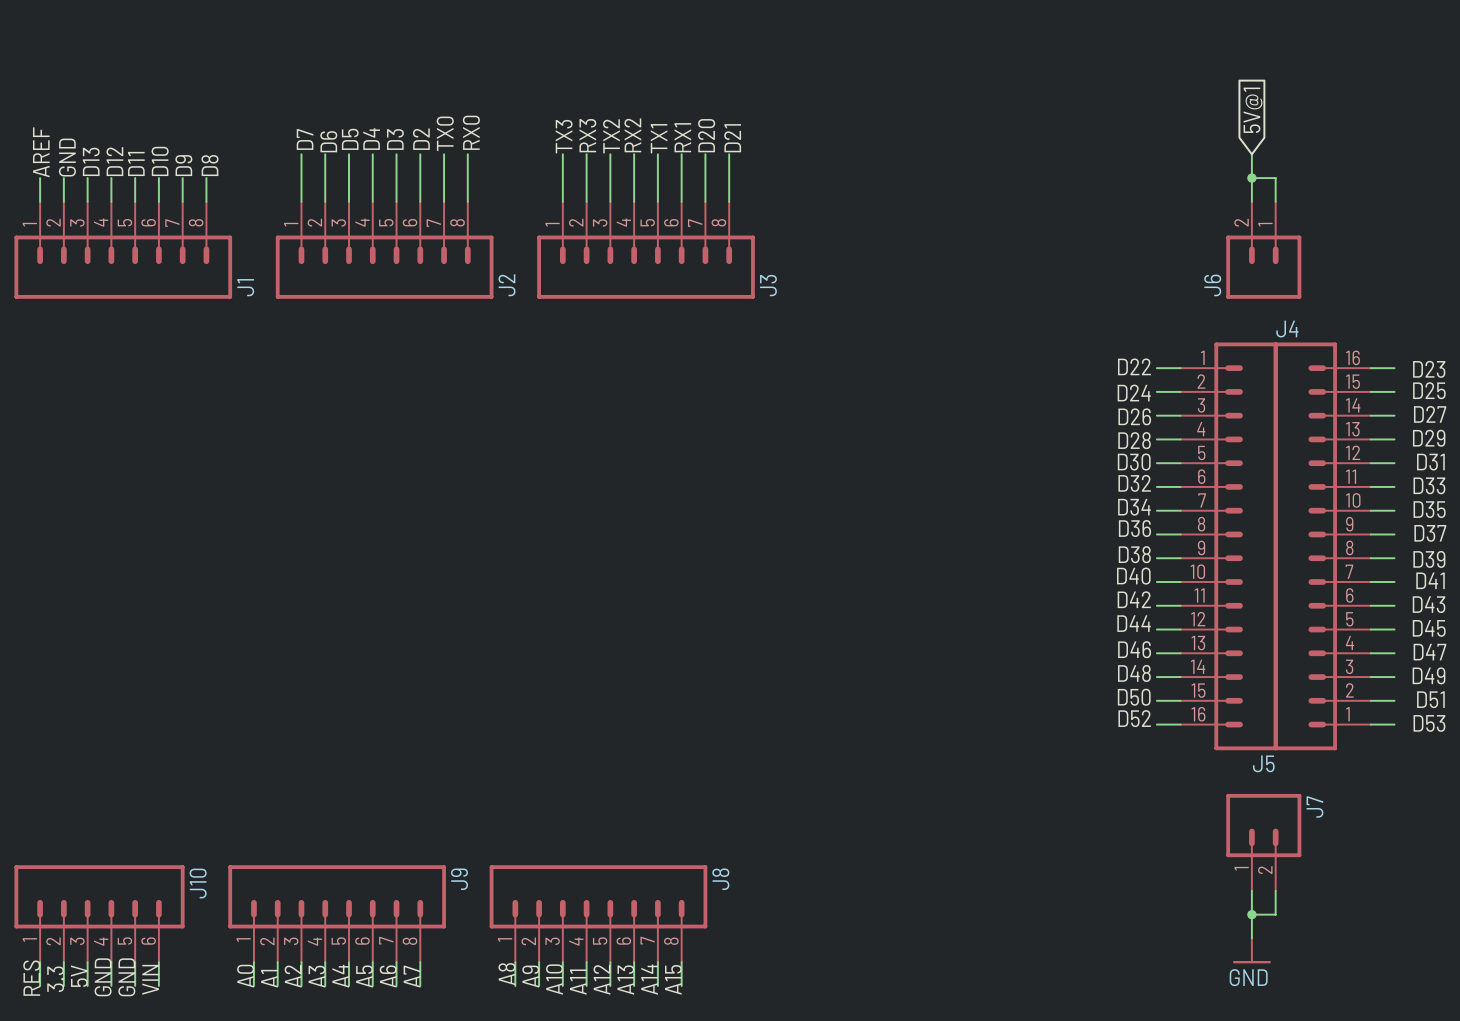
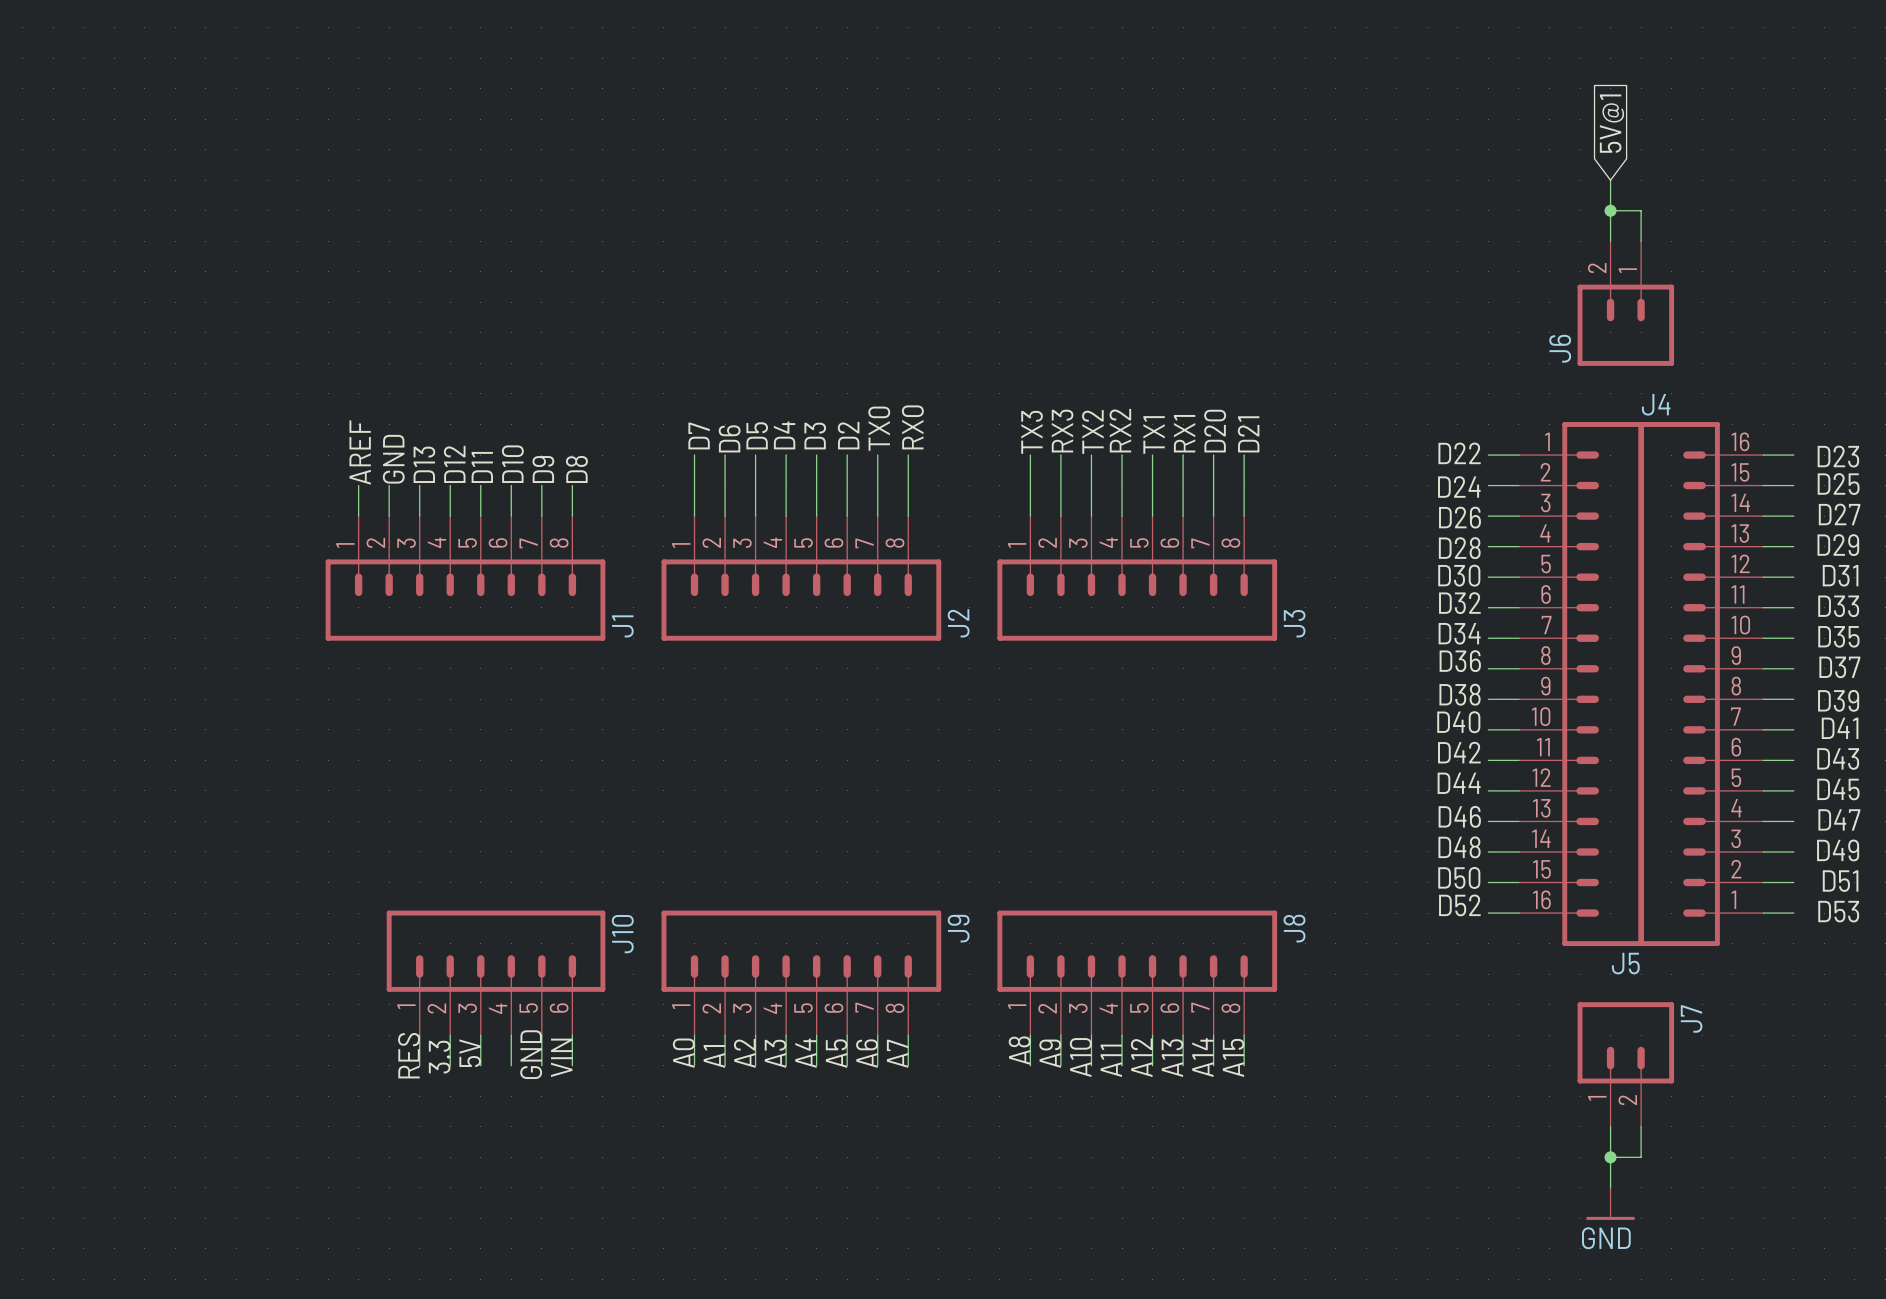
label: RX0 (471, 132) -> none
label: TX0 (445, 133) -> none
label: RX3 (587, 135) -> none
label: RX2 (632, 135) -> none
label: D20 (706, 135) -> none
label: TX3 (564, 136) -> none
label: TX2 (611, 136) -> none
label: RX1 (682, 137) -> none
label: TX1 (659, 138) -> none
label: D21 (732, 138) -> none
label: D7 (305, 139) -> none
label: D5 (350, 139) -> none
label: D4 (371, 139) -> none
label: D3 (395, 139) -> none
label: D2 (421, 139) -> none
label: D6 (328, 141) -> none
label: AREF (41, 152) -> none
wire: (301, 154) (301, 201) -> none
wire: (325, 154) (325, 201) -> none
wire: (349, 154) (349, 201) -> none
wire: (372, 154) (372, 201) -> none
wire: (396, 154) (396, 201) -> none
wire: (420, 154) (420, 201) -> none
wire: (444, 154) (444, 201) -> none
wire: (467, 154) (467, 201) -> none
wire: (562, 154) (562, 201) -> (694, 455) (694, 516)
wire: (586, 154) (586, 201) -> (725, 455) (725, 516)
wire: (610, 154) (610, 201) -> (755, 455) (755, 516)
wire: (634, 154) (634, 201) -> (786, 455) (786, 516)
wire: (657, 154) (657, 201) -> (816, 455) (816, 516)
wire: (681, 154) (681, 201) -> (847, 455) (847, 516)
wire: (705, 154) (705, 201) -> (877, 455) (877, 516)
wire: (729, 154) (729, 201) -> (908, 455) (908, 516)
label: GND (67, 157) -> none
label: D13 (91, 161) -> none
label: D12 (114, 161) -> none
label: D10 (160, 161) -> none
label: D11 (136, 163) -> none
label: D9 (183, 165) -> none
label: D8 (209, 165) -> none
wire: (40, 178) (40, 201) -> none
wire: (63, 178) (63, 201) -> none
wire: (87, 178) (87, 201) -> none
wire: (111, 178) (111, 201) -> none
wire: (135, 178) (135, 201) -> none
wire: (158, 178) (158, 201) -> none
wire: (182, 178) (182, 201) -> none
wire: (206, 178) (206, 201) -> (358, 485) (358, 516)
J1 position: (123, 250) -> (465, 578)
J2 position: (384, 250) -> (801, 578)
J3 position: (646, 250) -> (1137, 578)
label: none -> RX0 (912, 427)
label: none -> TX0 (879, 428)
label: none -> RX3 (1062, 431)
label: none -> RX2 (1120, 430)
label: none -> D20 (1215, 431)
label: none -> TX3 (1032, 432)
label: none -> TX2 (1092, 431)
label: none -> RX1 (1184, 433)
label: none -> D4 (784, 435)
label: none -> TX1 (1154, 435)
label: none -> D21 (1248, 434)
label: none -> D7 (699, 436)
label: none -> D5 (757, 435)
label: none -> D3 (815, 436)
label: none -> D2 (848, 435)
label: none -> D6 (729, 438)
label: none -> AREF (360, 452)
wire: none -> (1030, 455) (1030, 516)
wire: none -> (1060, 455) (1060, 516)
wire: none -> (1091, 455) (1091, 516)
wire: none -> (1122, 455) (1122, 516)
wire: none -> (1152, 455) (1152, 516)
wire: none -> (1183, 455) (1183, 516)
wire: none -> (1213, 455) (1213, 516)
wire: none -> (1244, 455) (1244, 516)
label: none -> GND (393, 459)
label: none -> D13 (424, 464)
label: none -> D12 (454, 464)
label: none -> D10 (512, 464)
label: none -> D11 (482, 467)
label: none -> D9 (543, 469)
label: none -> D8 (576, 469)
wire: none -> (389, 485) (389, 516)
wire: none -> (419, 485) (419, 516)
wire: none -> (450, 485) (450, 516)
wire: none -> (480, 485) (480, 516)
wire: none -> (511, 485) (511, 516)
wire: none -> (541, 485) (541, 516)
wire: none -> (572, 485) (572, 516)
wire: none -> (1030, 1035) (1030, 1065)
wire: none -> (1060, 1035) (1060, 1065)
wire: none -> (1091, 1035) (1091, 1065)
wire: none -> (1122, 1035) (1122, 1065)
wire: none -> (1152, 1035) (1152, 1065)
wire: none -> (1183, 1035) (1183, 1065)
wire: none -> (1213, 1035) (1213, 1065)
wire: none -> (1244, 1035) (1244, 1065)
label: none -> A8 (1019, 1050)
label: none -> 5V (470, 1053)
label: none -> A0 (683, 1053)
label: none -> A2 (744, 1053)
label: none -> A4 (805, 1053)
label: none -> A5 (836, 1053)
label: none -> A6 (867, 1053)
label: none -> GND (531, 1054)
label: none -> A3 (775, 1053)
label: none -> A7 (897, 1053)
label: none -> A9 (1050, 1053)
label: none -> RES (409, 1055)
label: none -> 3.3 (439, 1057)
label: none -> A1 (714, 1056)
label: none -> VIN (561, 1057)
label: none -> A10 (1080, 1057)
label: none -> A12 (1141, 1057)
label: none -> A13 (1172, 1058)
label: none -> A14 (1202, 1057)
label: none -> A15 (1233, 1057)
label: none -> A11 (1111, 1060)
J10 position: (99, 913) -> (496, 972)
J9 position: (337, 913) -> (801, 972)
J8 position: (598, 913) -> (1137, 972)
wire: (40, 962) (40, 985) -> none
wire: (63, 962) (63, 985) -> none
wire: (87, 962) (87, 985) -> none
wire: (111, 962) (111, 985) -> none
wire: (135, 962) (135, 985) -> none
wire: (158, 962) (158, 985) -> none
wire: (253, 962) (253, 985) -> none
wire: (277, 962) (277, 985) -> none
wire: (301, 962) (301, 985) -> (419, 1035) (419, 1065)
wire: (325, 962) (325, 985) -> (450, 1035) (450, 1065)
wire: (349, 962) (349, 985) -> (480, 1035) (480, 1065)
wire: (372, 962) (372, 985) -> (511, 1035) (511, 1065)
wire: (396, 962) (396, 985) -> (541, 1035) (541, 1065)
wire: (420, 962) (420, 985) -> (572, 1035) (572, 1065)
wire: (515, 962) (515, 985) -> (694, 1035) (694, 1065)
wire: (539, 962) (539, 985) -> (725, 1035) (725, 1065)
wire: (562, 962) (562, 985) -> (755, 1035) (755, 1065)
wire: (586, 962) (586, 985) -> (786, 1035) (786, 1065)
wire: (610, 962) (610, 985) -> (816, 1035) (816, 1065)
wire: (634, 962) (634, 985) -> (847, 1035) (847, 1065)
wire: (657, 962) (657, 985) -> (877, 1035) (877, 1065)
wire: (681, 962) (681, 985) -> (908, 1035) (908, 1065)
label: A8 (506, 974) -> none
label: 5V (79, 976) -> none
label: A0 (245, 976) -> none
label: A2 (293, 976) -> none
label: A3 (317, 976) -> none
label: A4 (340, 976) -> none
label: A5 (364, 976) -> none
label: A6 (388, 976) -> none
label: A7 (411, 976) -> none
label: A9 (530, 976) -> none
label: GND (103, 977) -> none
label: GND (126, 977) -> none
label: RES (31, 978) -> none
label: A1 (269, 978) -> none
label: 3.3 (55, 979) -> none
label: VIN (150, 979) -> none
label: A10 (554, 979) -> none
label: A12 (601, 979) -> none
label: A14 (649, 979) -> none
label: A15 (673, 979) -> none
label: A13 (625, 980) -> none
label: A11 (578, 982) -> none

